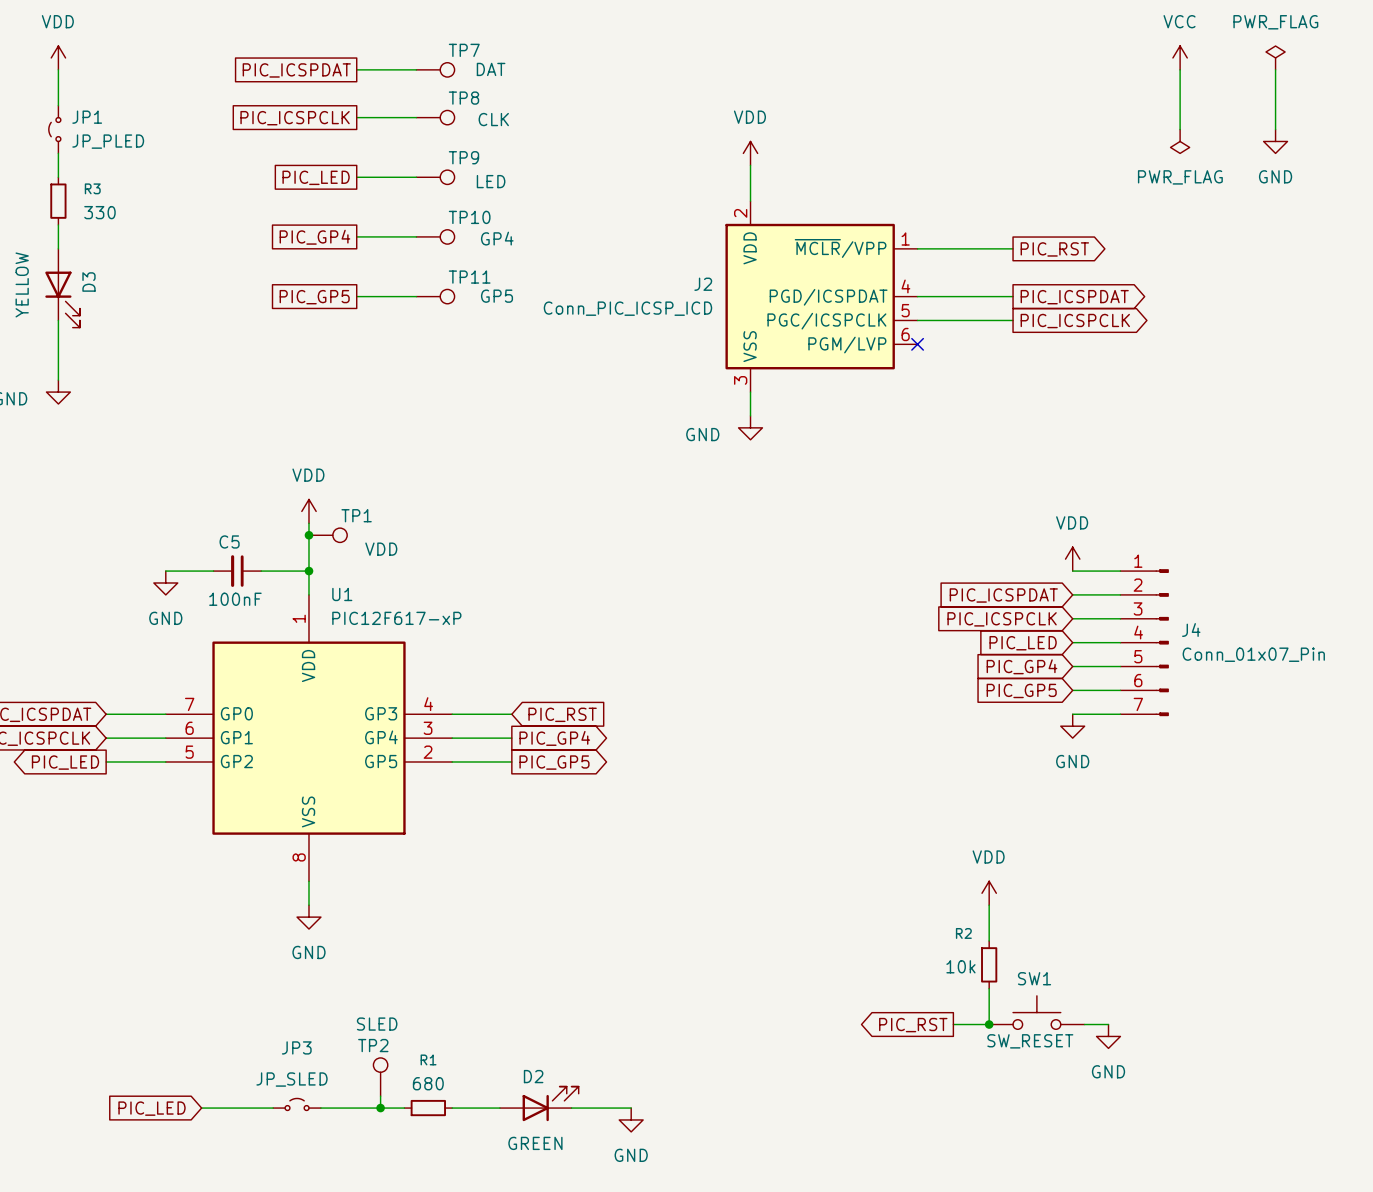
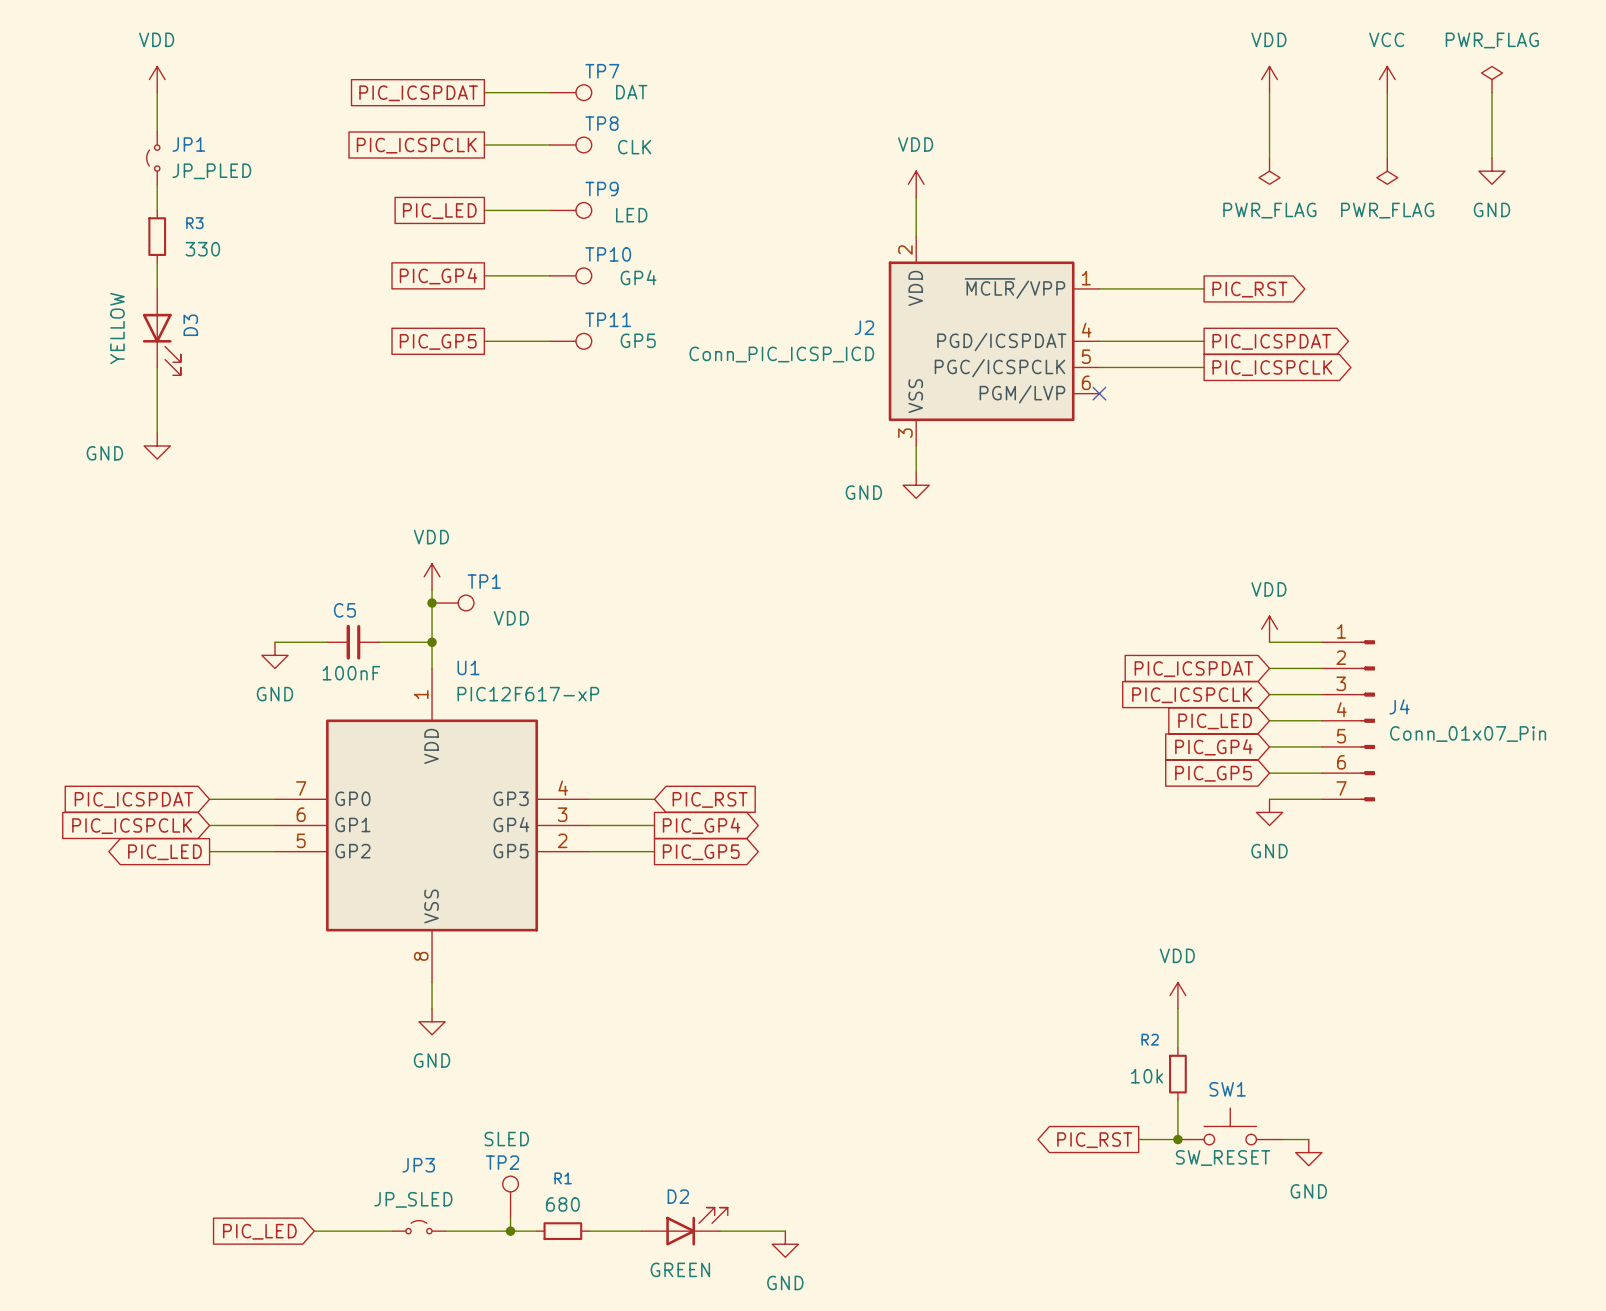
power symbol: none -> VDD (1269, 79)
wire: none -> (1269, 92) (1269, 158)
power symbol: none -> PWR_FLAG (1269, 171)

